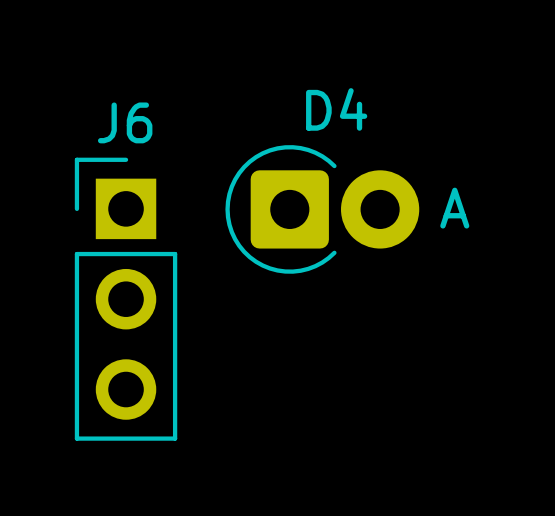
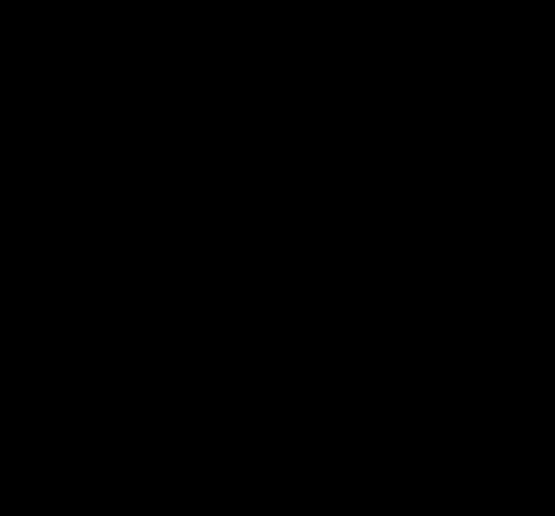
D4: (322, 209) -> none
J6: (126, 299) -> none

